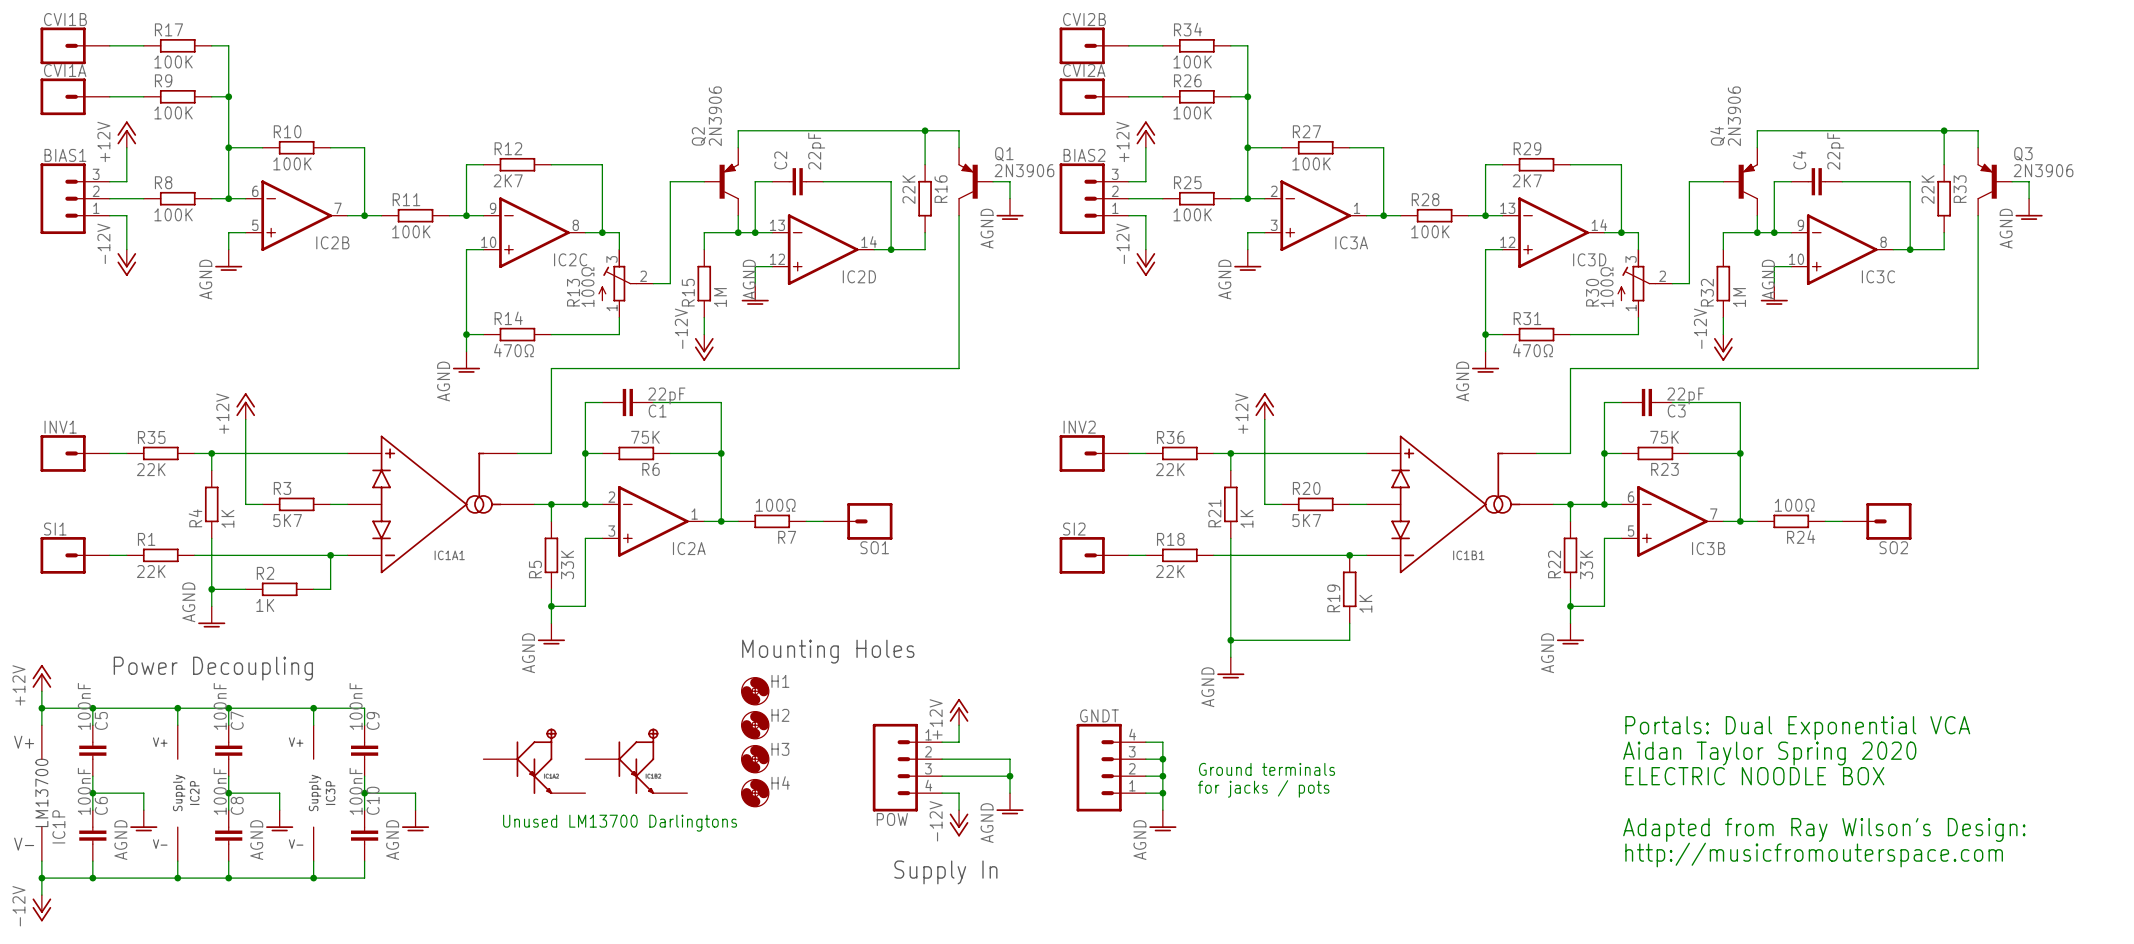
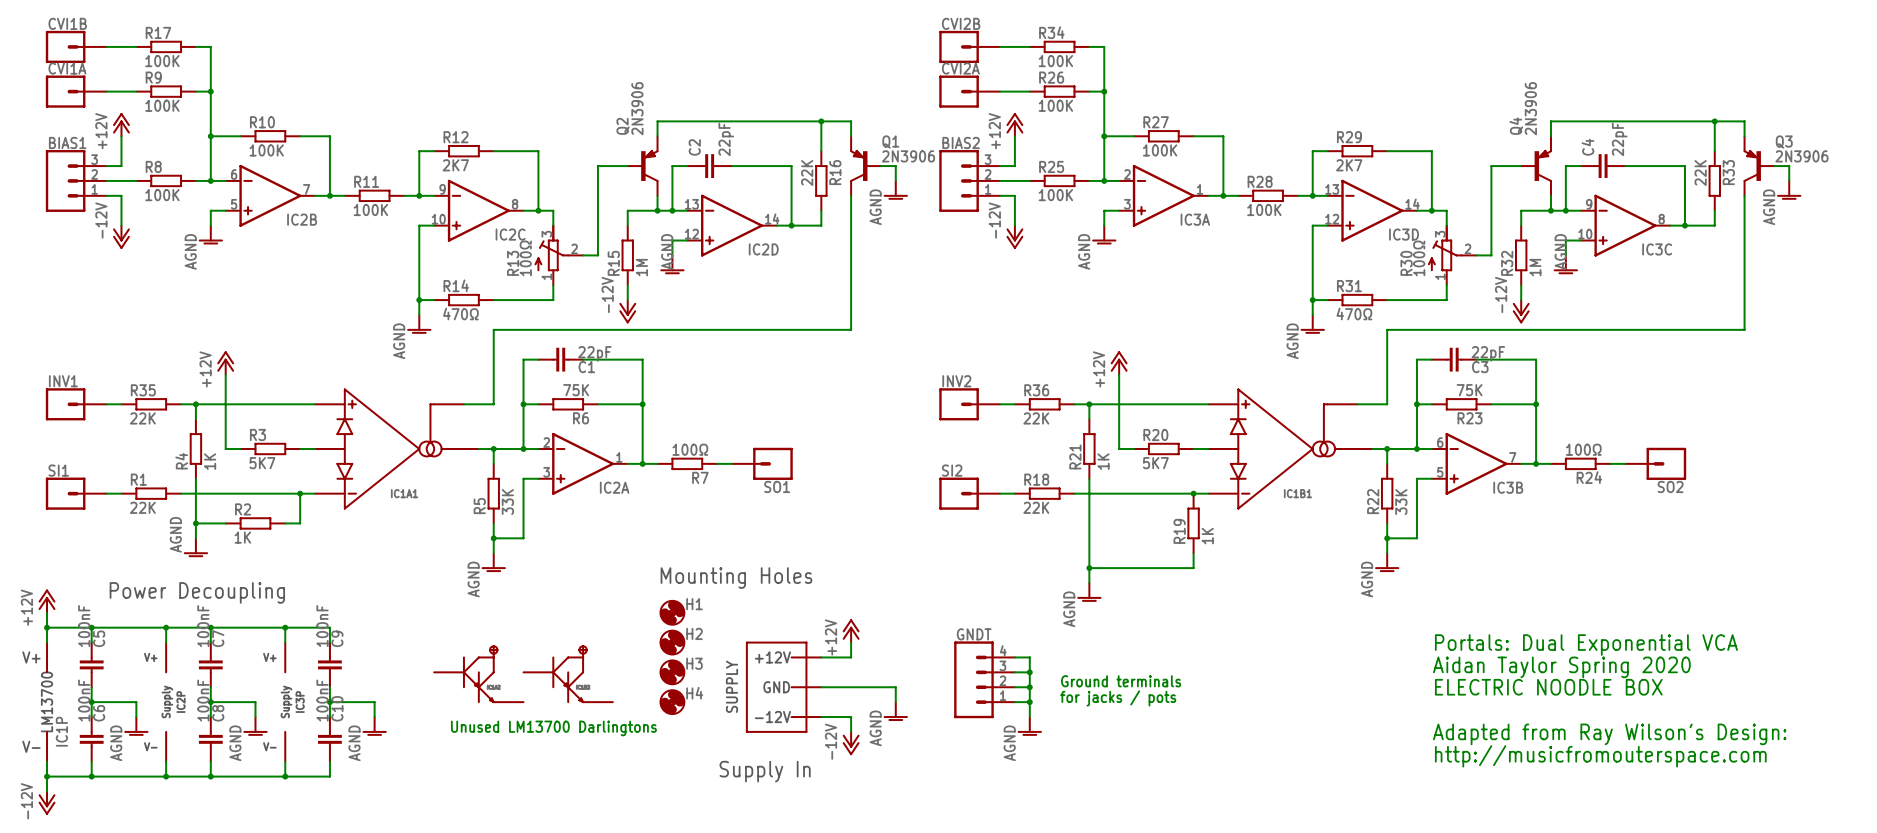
wire: (942, 759) (1010, 759) (1010, 776) -> none
POW: (907, 767) -> none
part: none -> (783, 687)
junction: (1010, 776) -> none
wire: (942, 793) (959, 793) (959, 810) -> none
wire: none -> (821, 717) (851, 717) (851, 731)
power symbol position: -12V (959, 823) -> -12V (851, 743)
text position: Supply In (945, 872) -> Supply In (765, 771)

